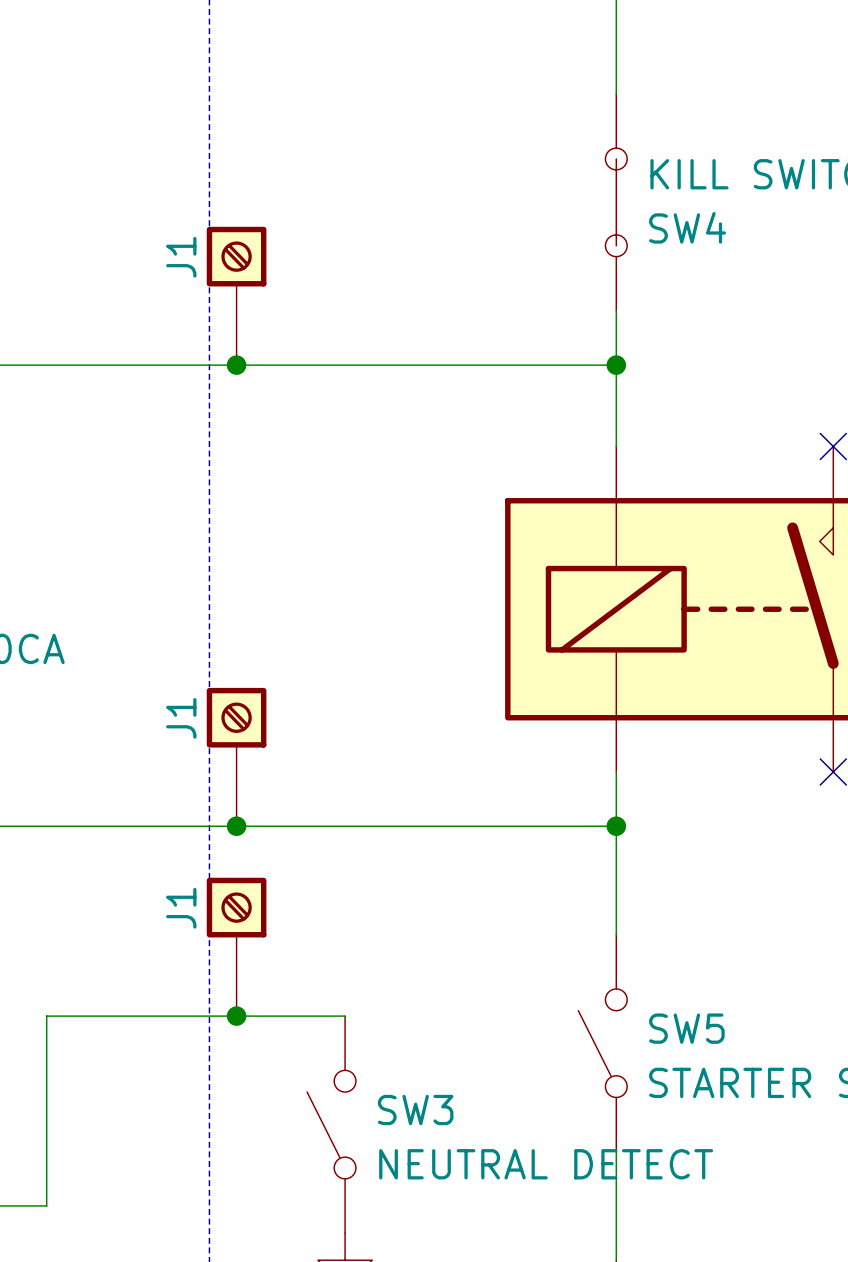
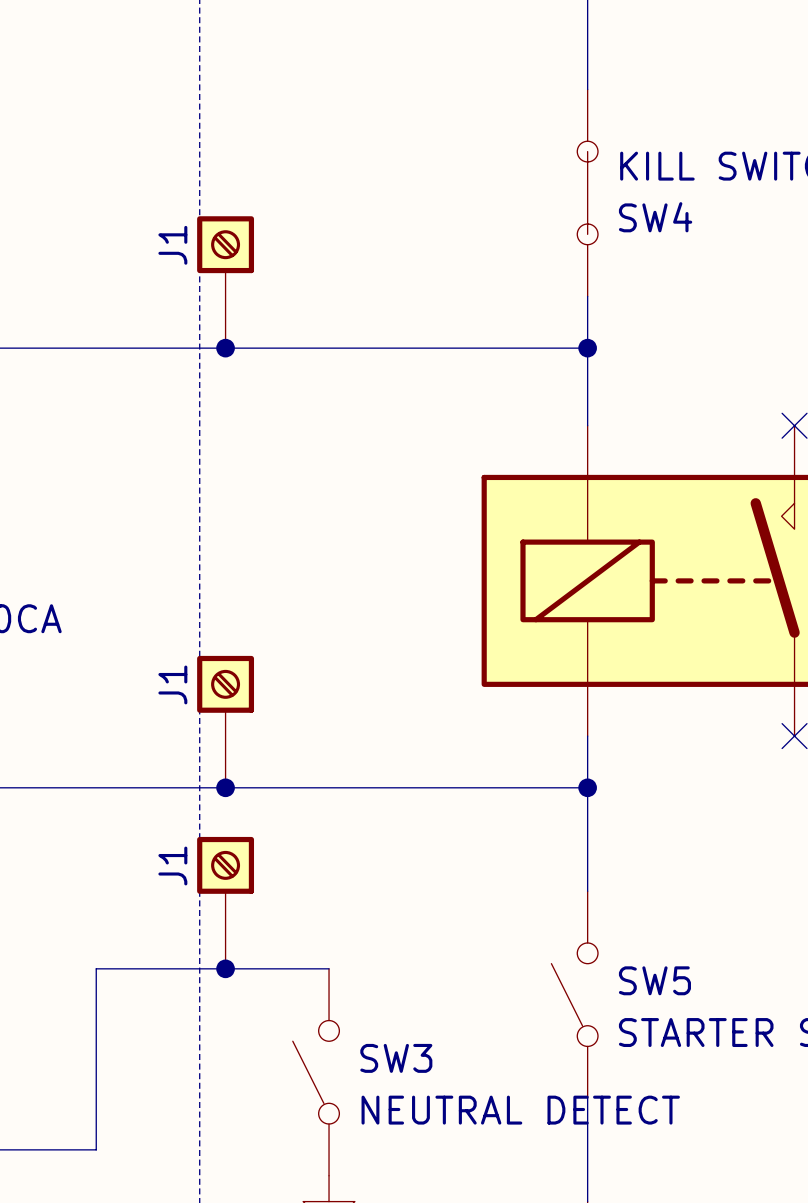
wire: (100, 1016) (46, 1016) (46, 1205) -> (96, 968) (96, 1149) (44, 1149)

